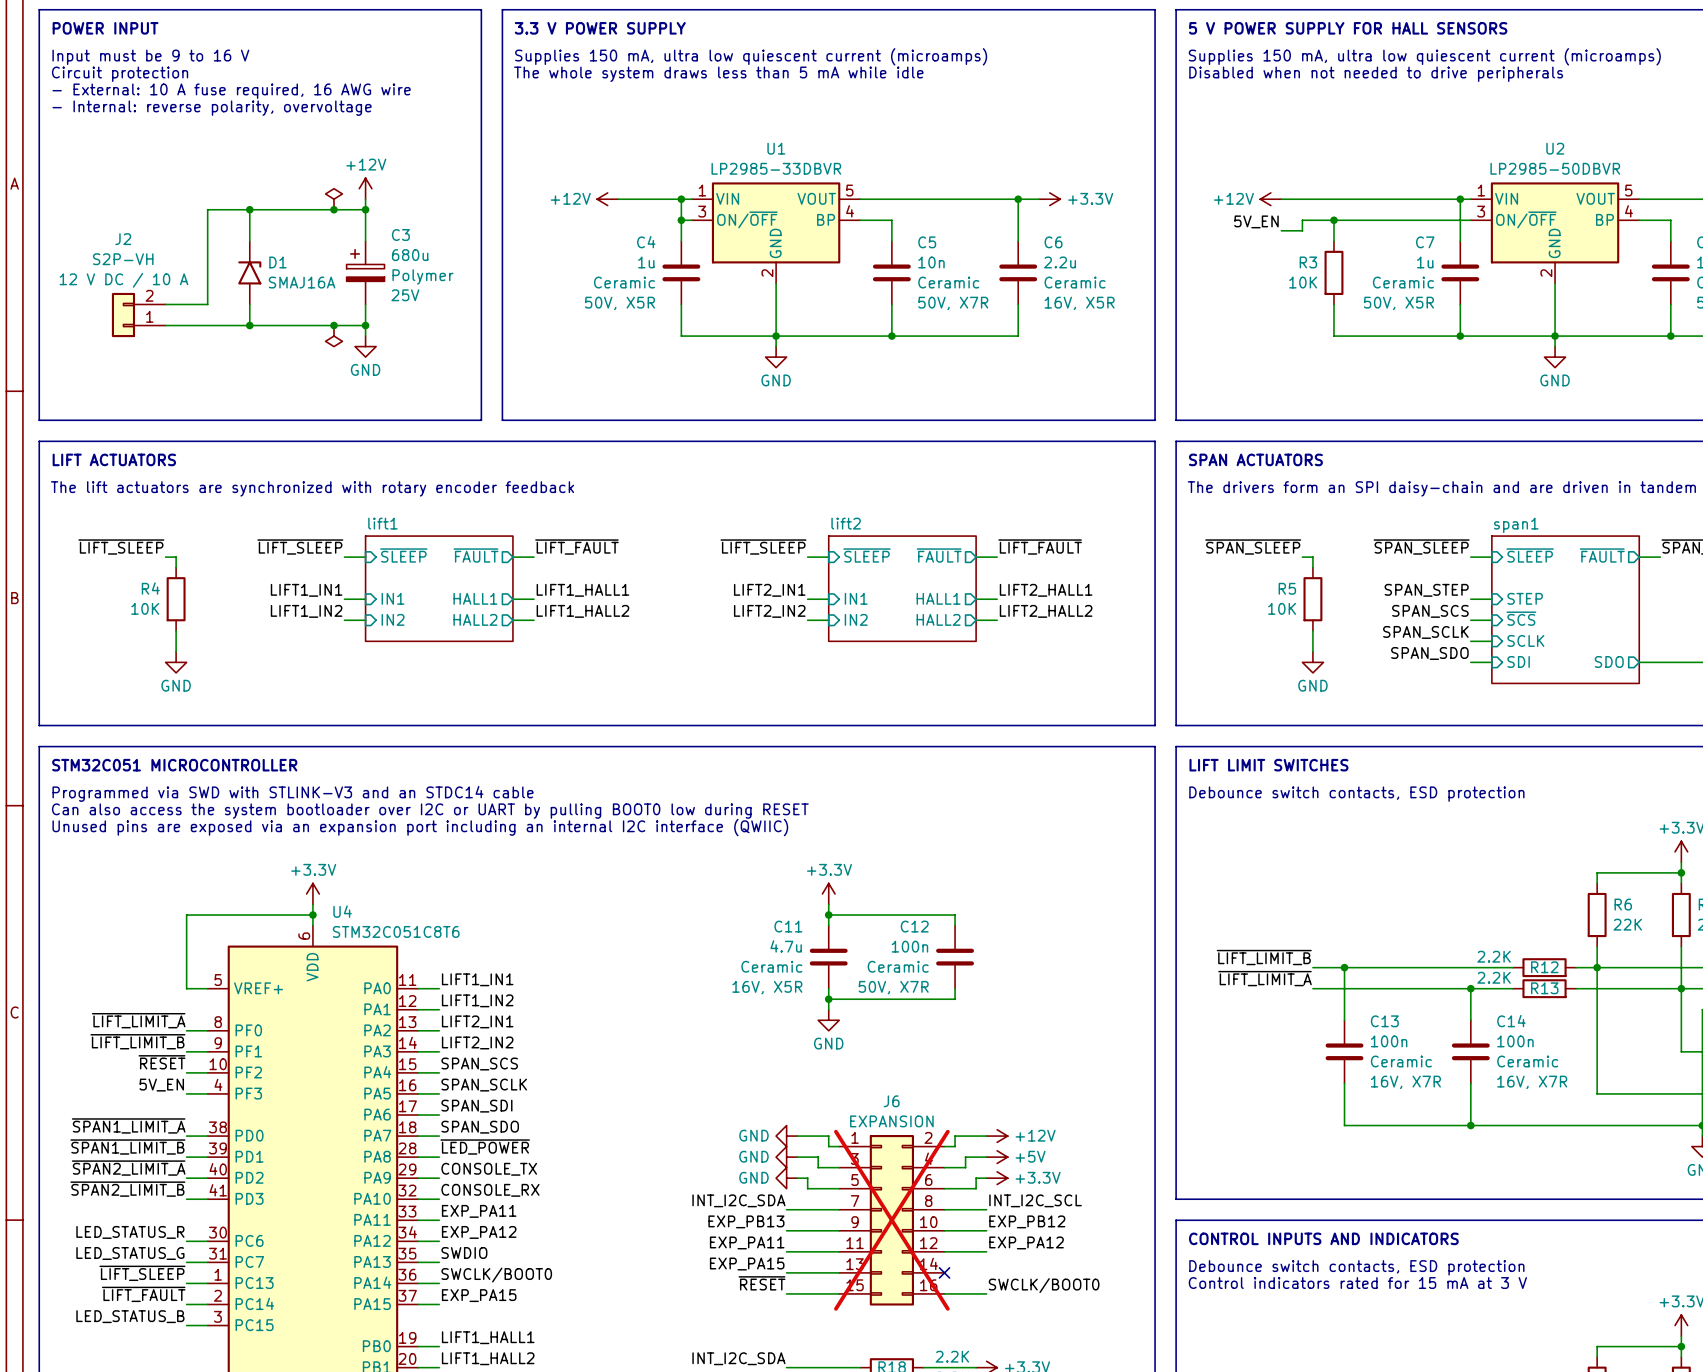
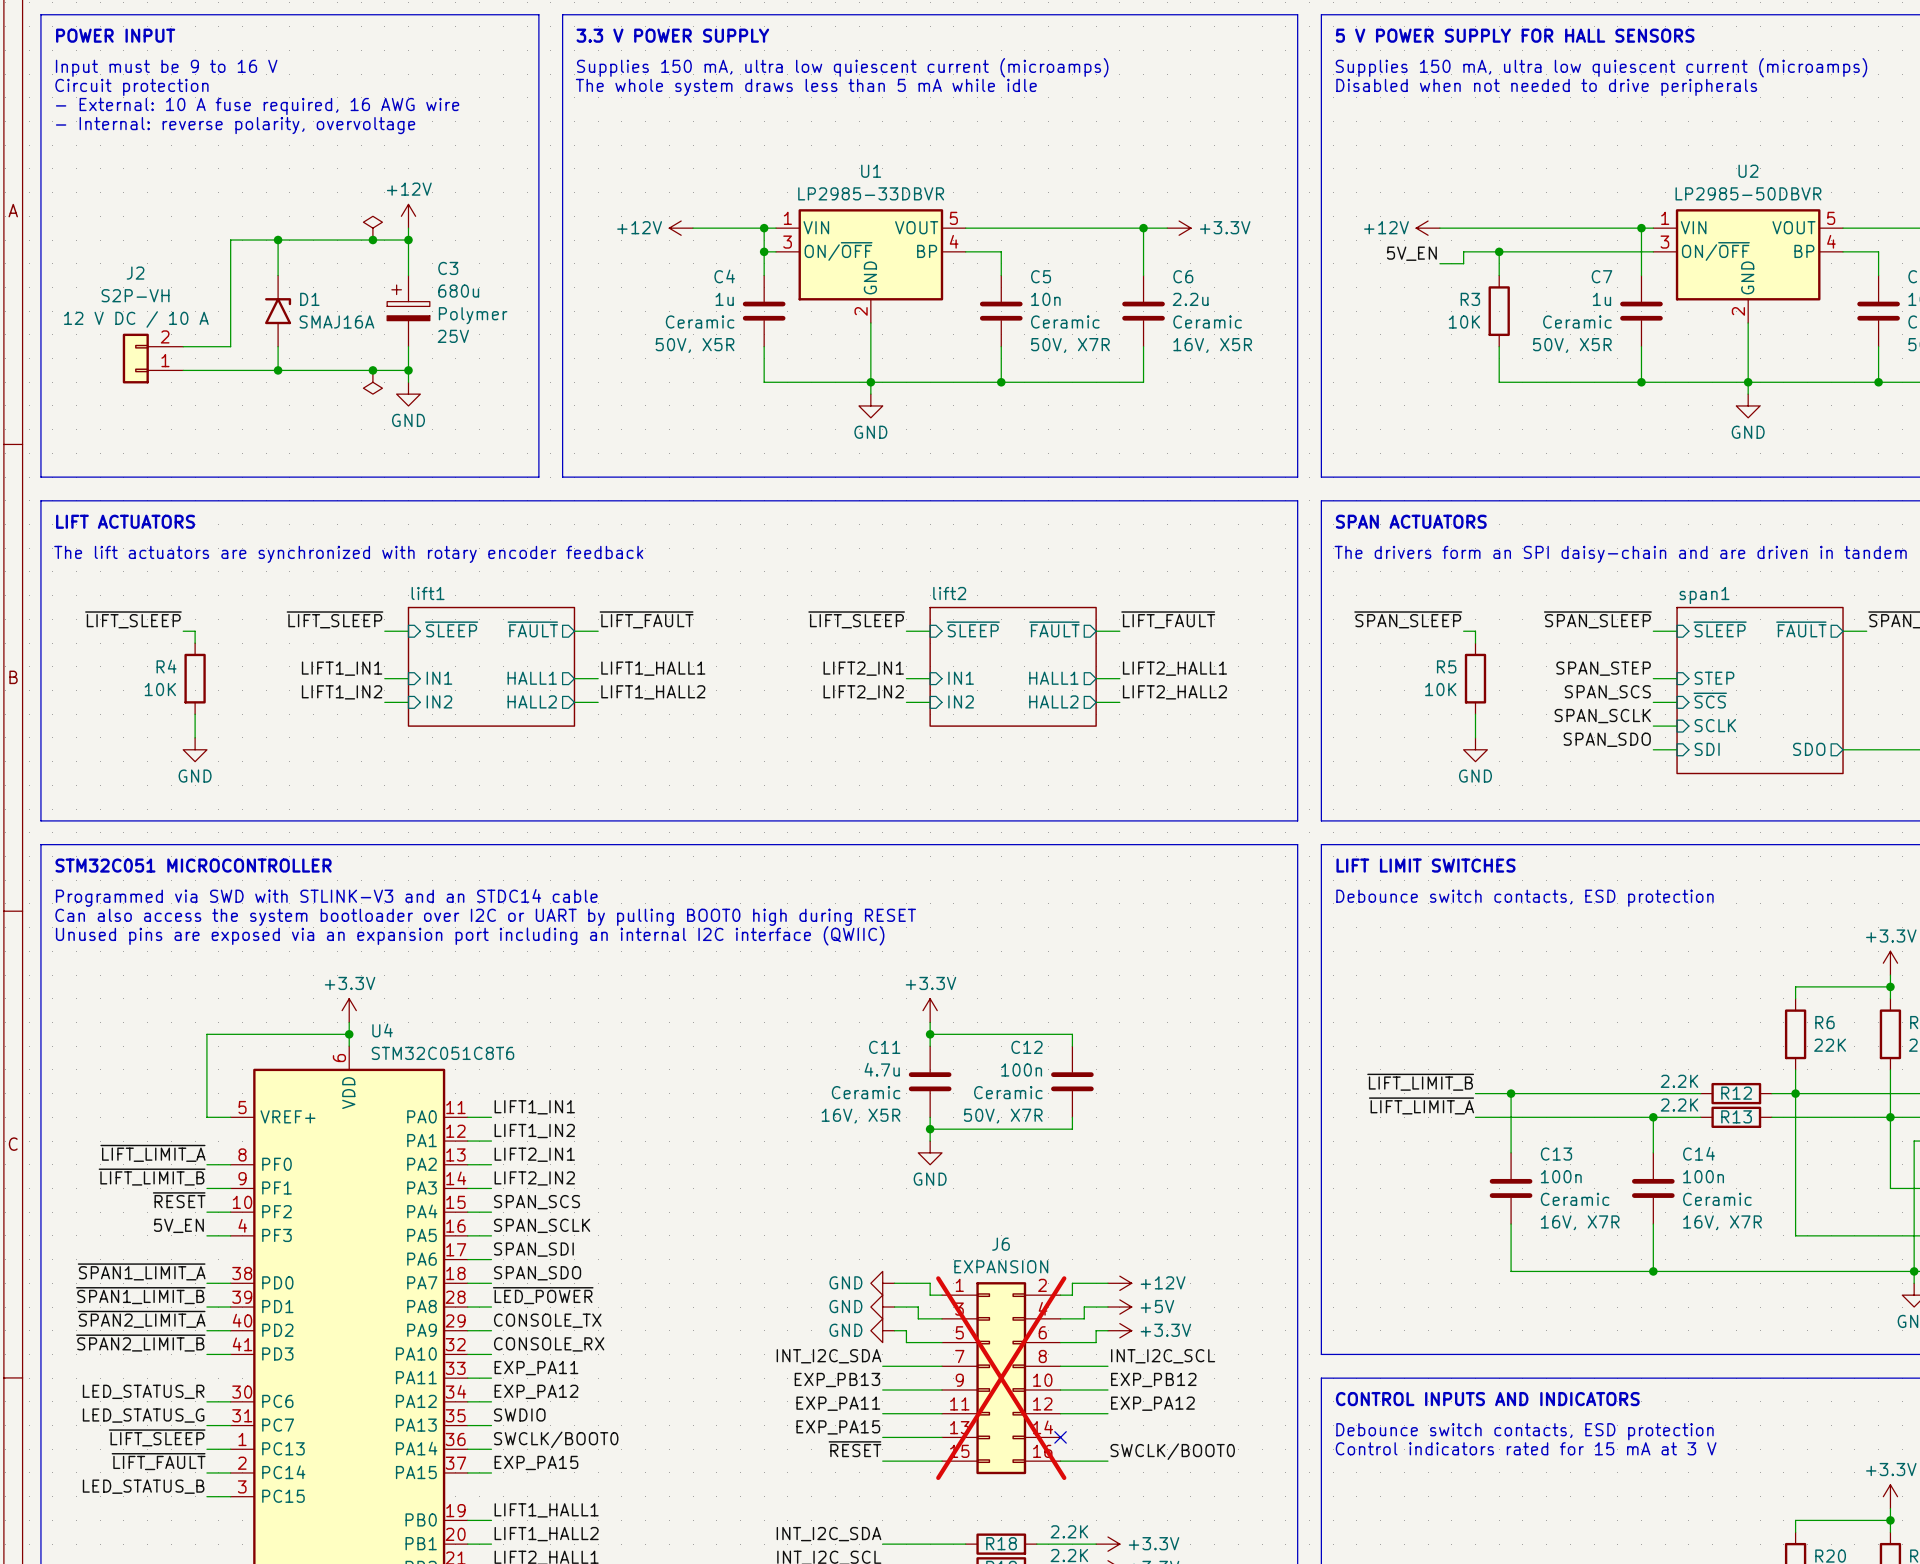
text: Can also access the system bootloader over I2C or UART by pulling BOOT0 low during RESET (430, 811) -> Can also access the system bootloader over I2C or UART by pulling BOOT0 high during RESET (485, 917)

